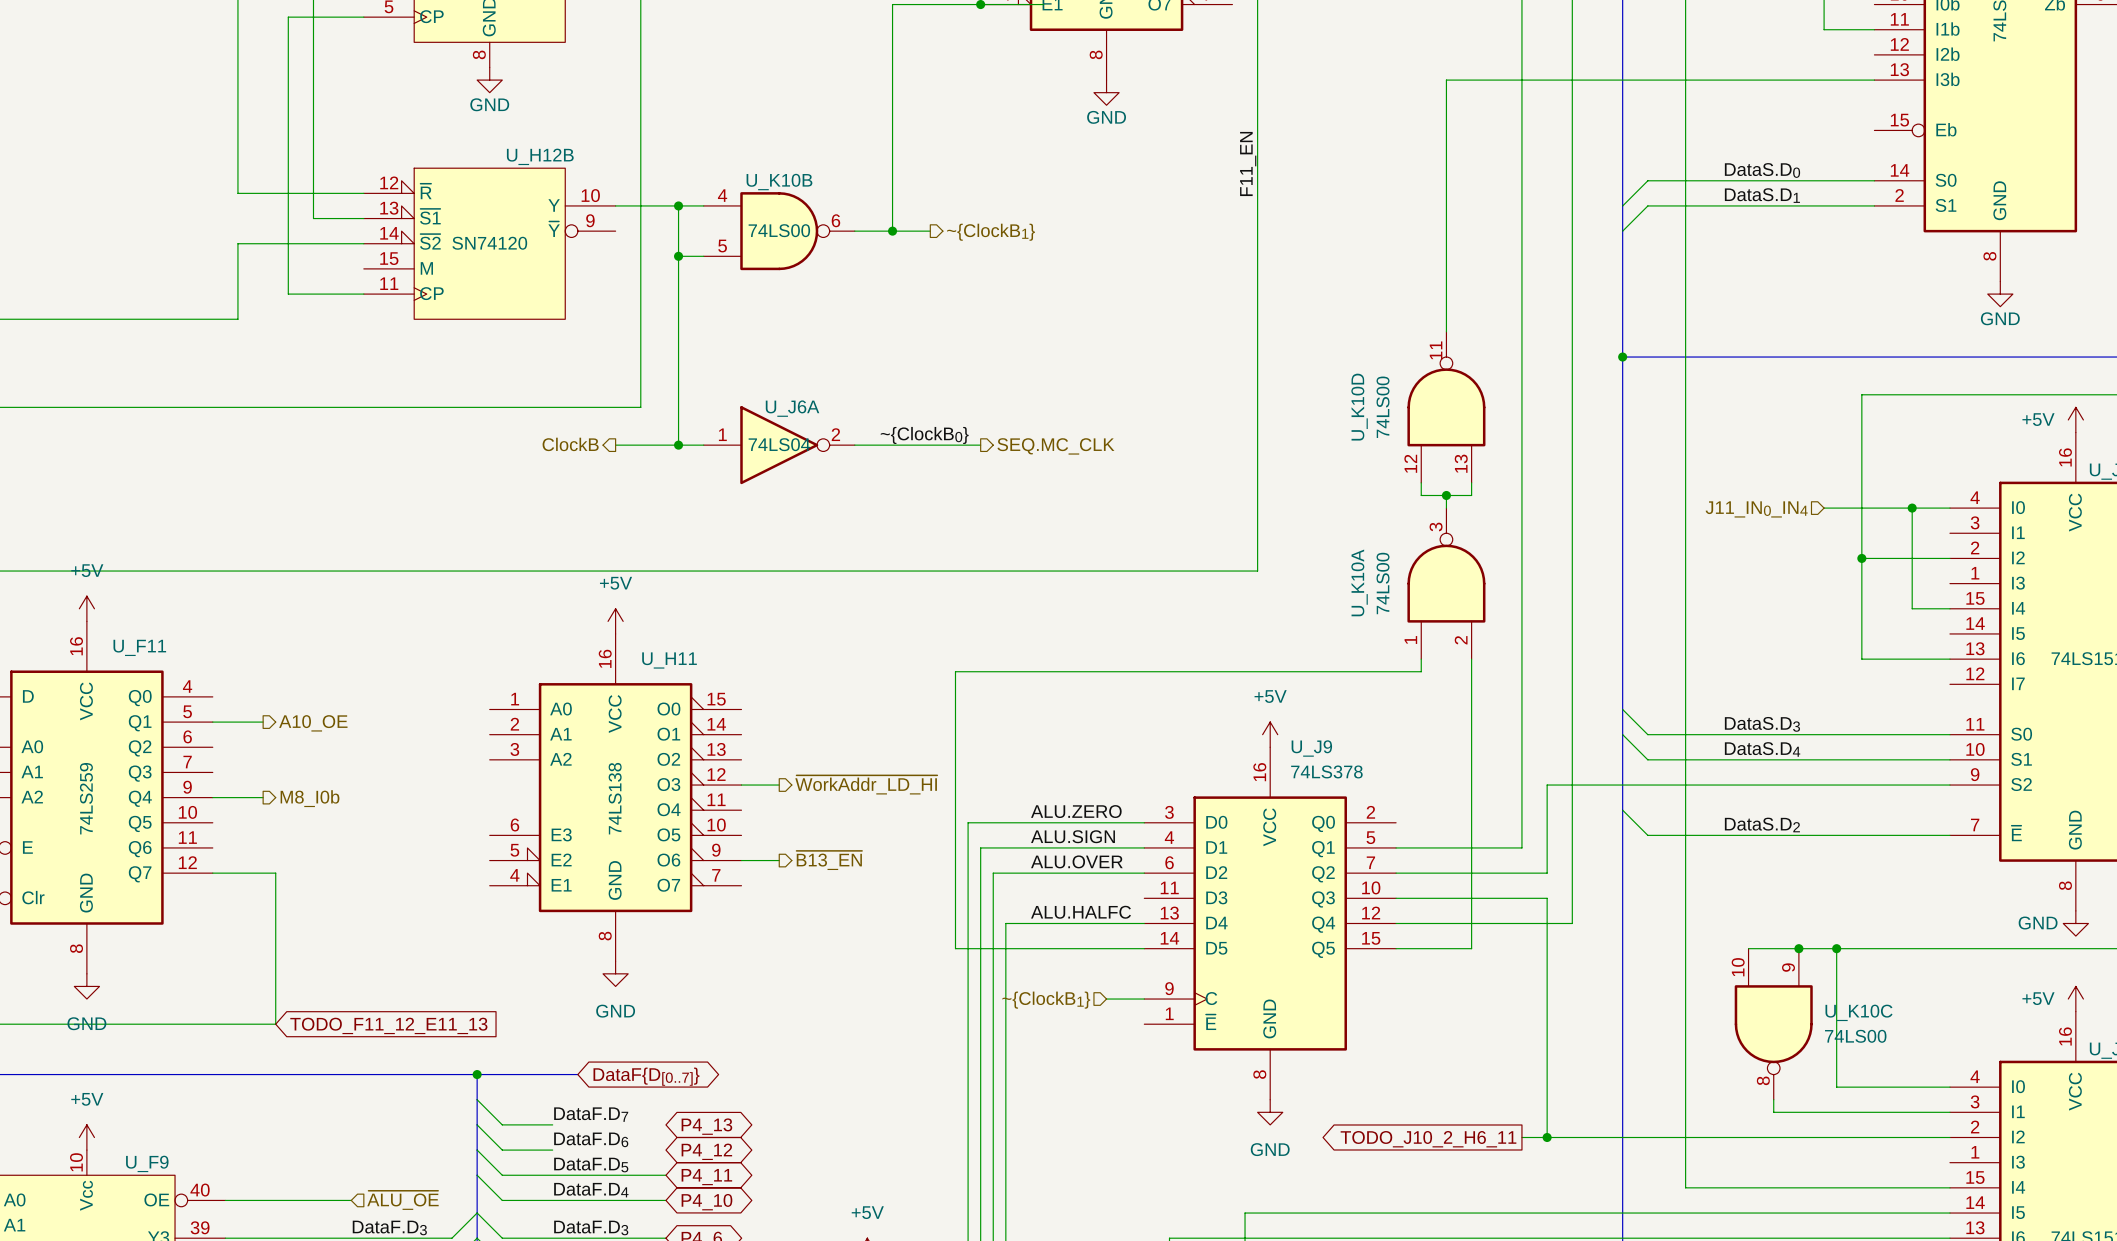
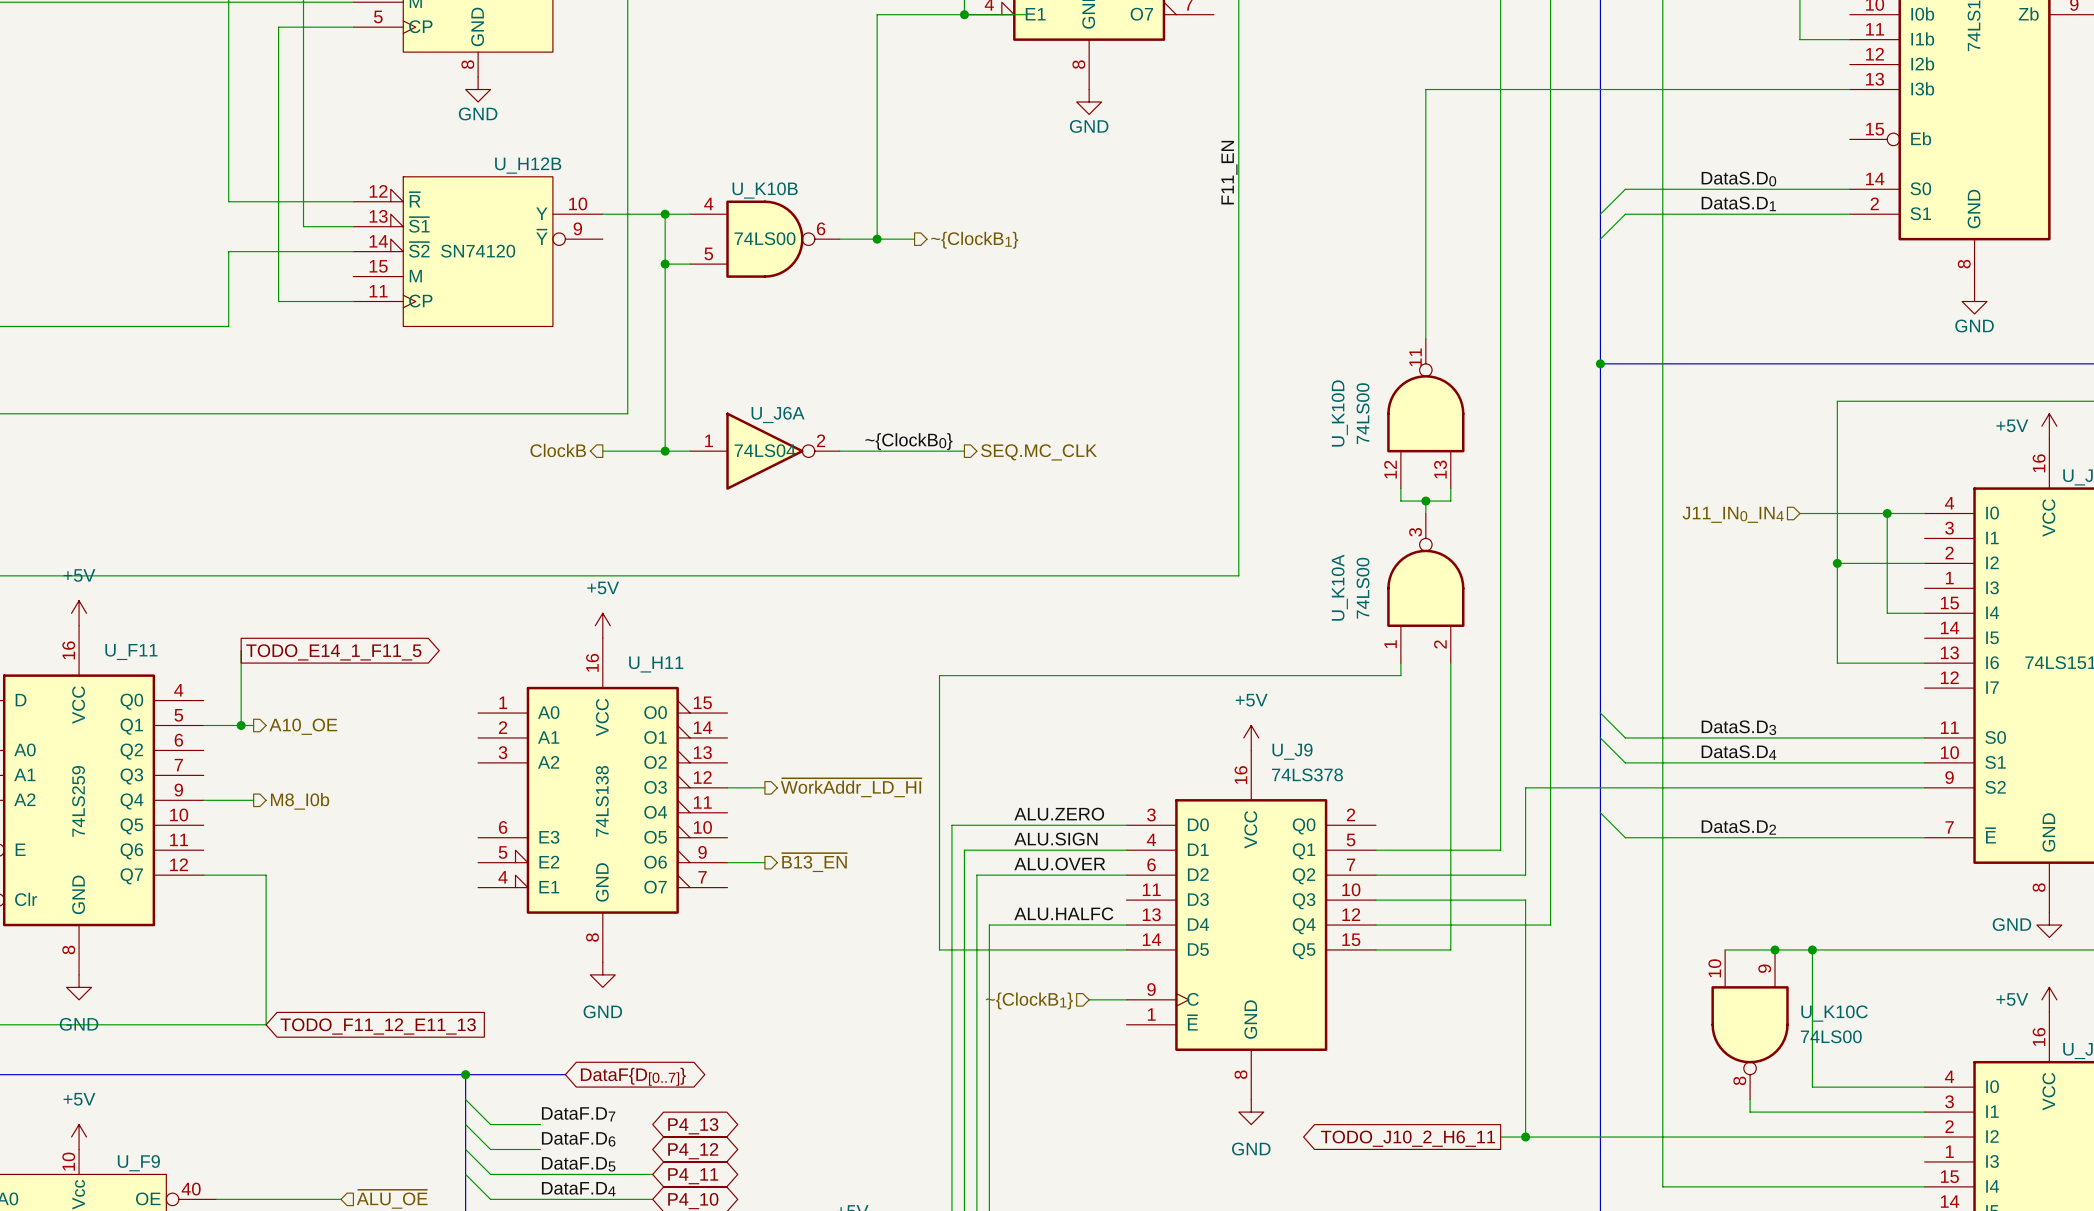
wire: none -> (241, 650) (241, 725)
global label: none -> TODO_E14_1_F11_5 (333, 652)
junction: none -> (241, 725)

